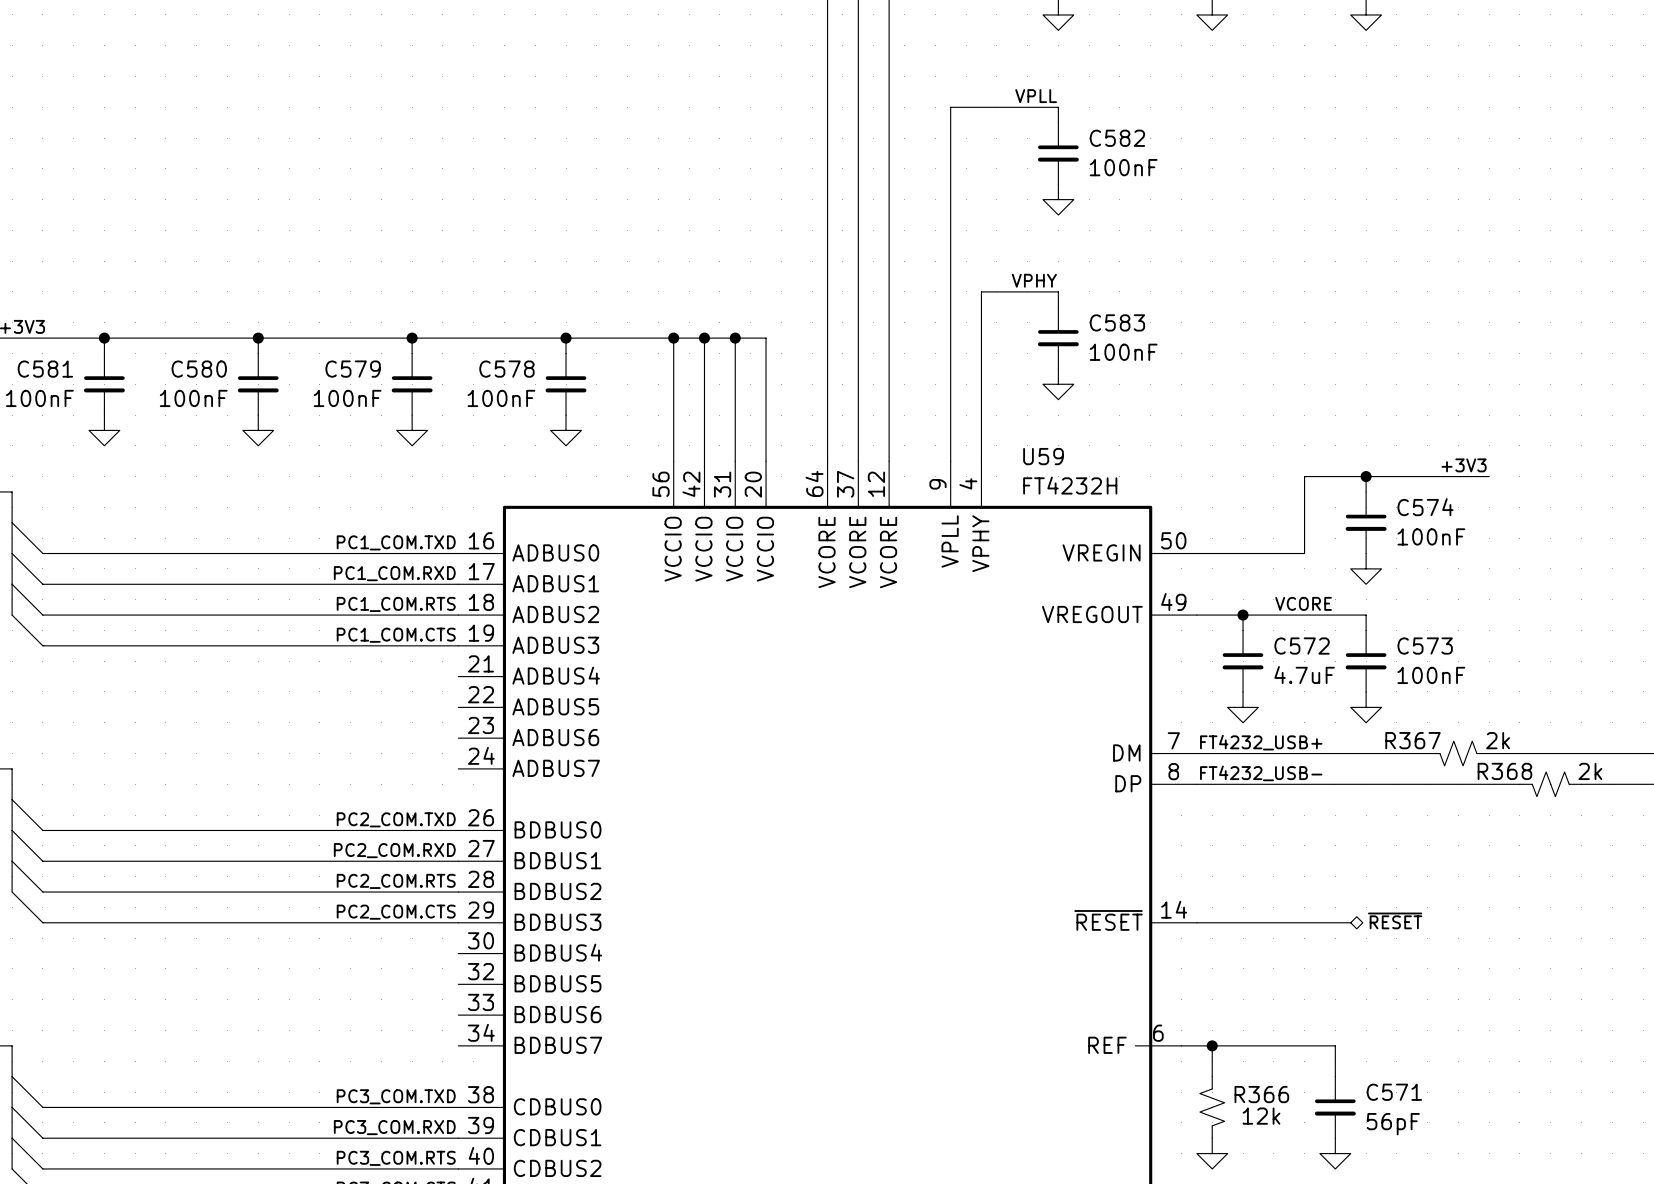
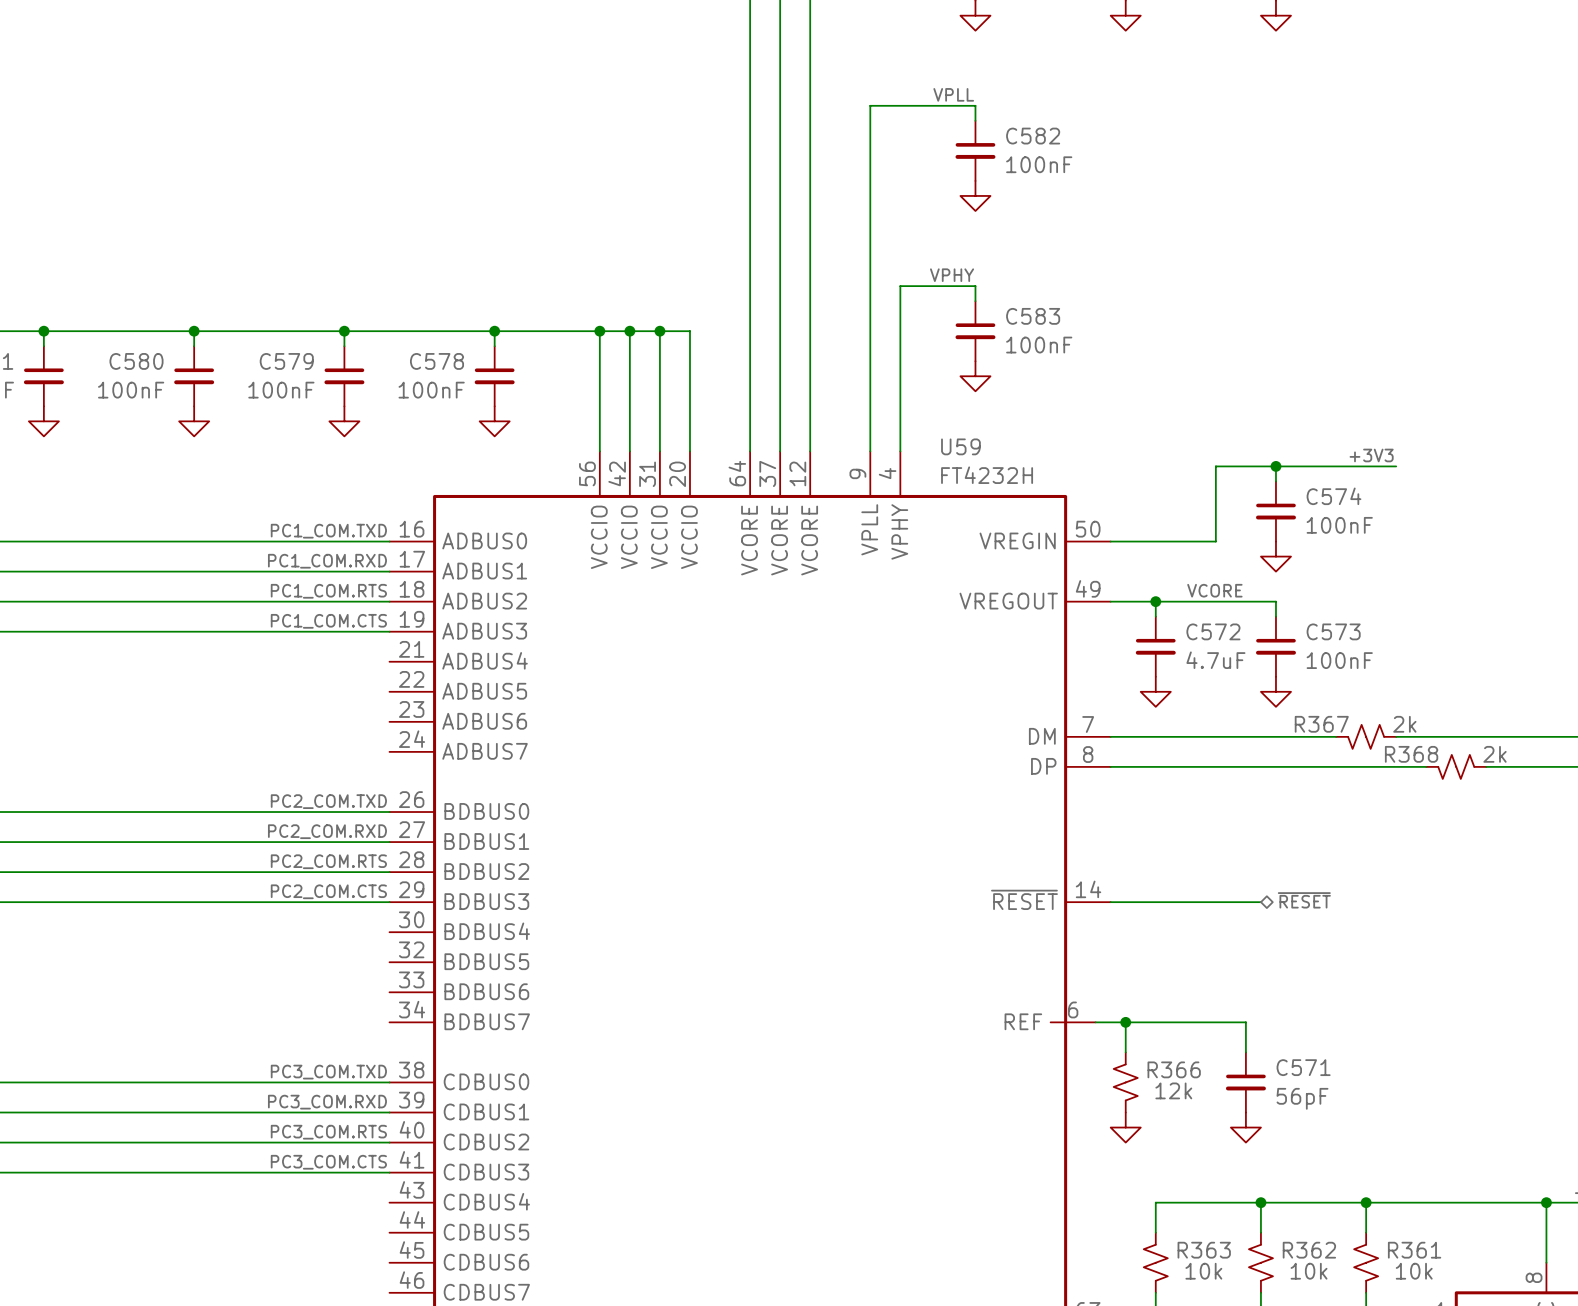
label: FT4232_USB+ (1261, 742) -> none
label: FT4232_USB- (1261, 773) -> none

